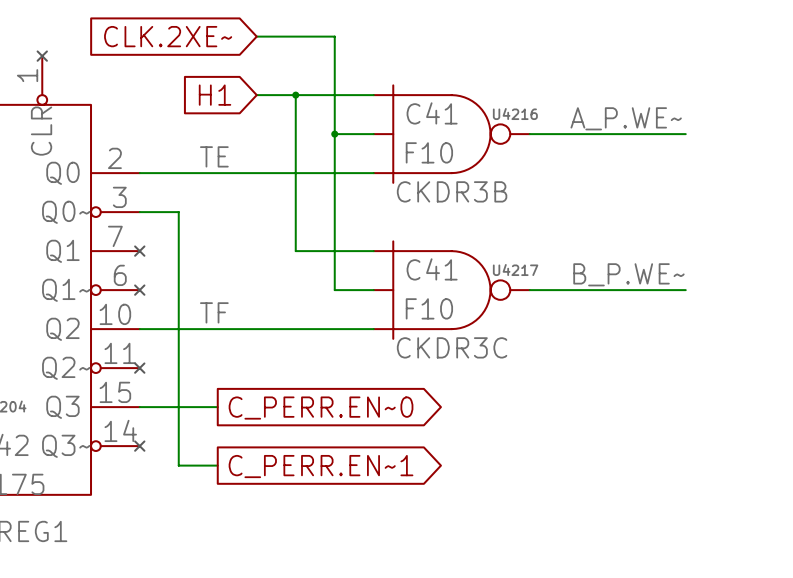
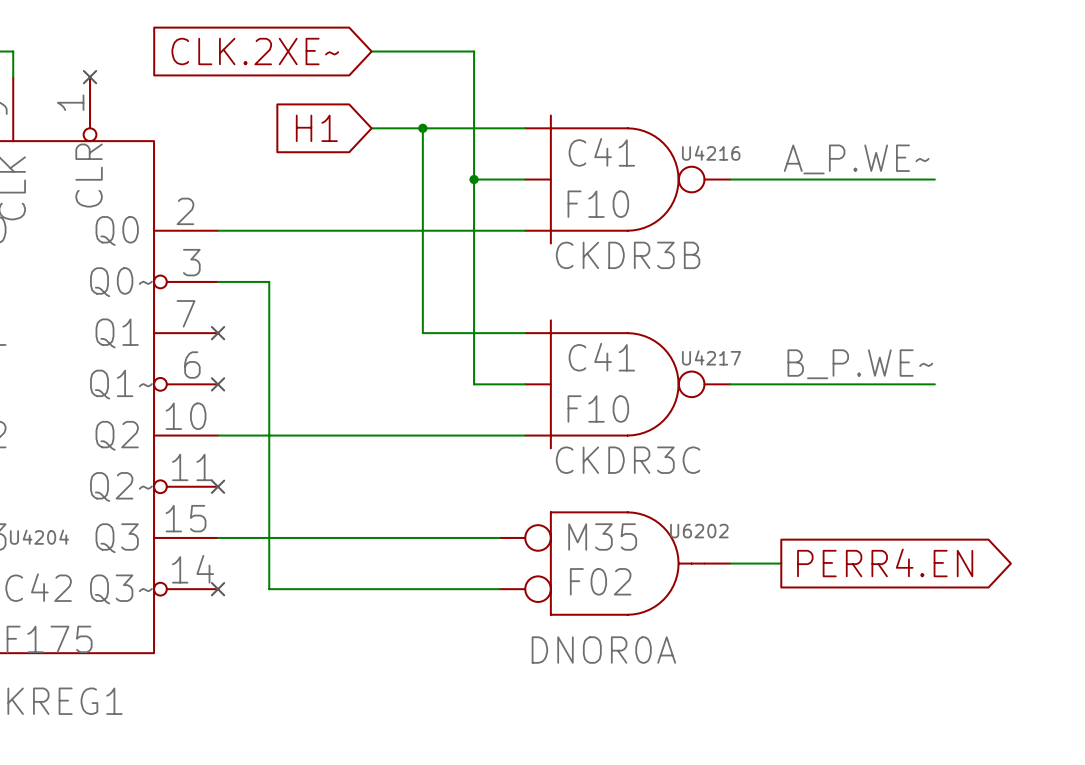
label: TE (214, 156) -> none
label: TF (214, 312) -> none
wire: none -> (320, 537) (499, 537)
global label: C_PERR.EN~0 (321, 408) -> none
U6202: none -> F02 (614, 563)
wire: none -> (730, 563) (781, 563)
global label: none -> PERR4.EN (885, 562)
wire: (178, 446) (178, 465) (217, 465) -> (269, 589) (499, 589)
global label: C_PERR.EN~1 (321, 466) -> none

